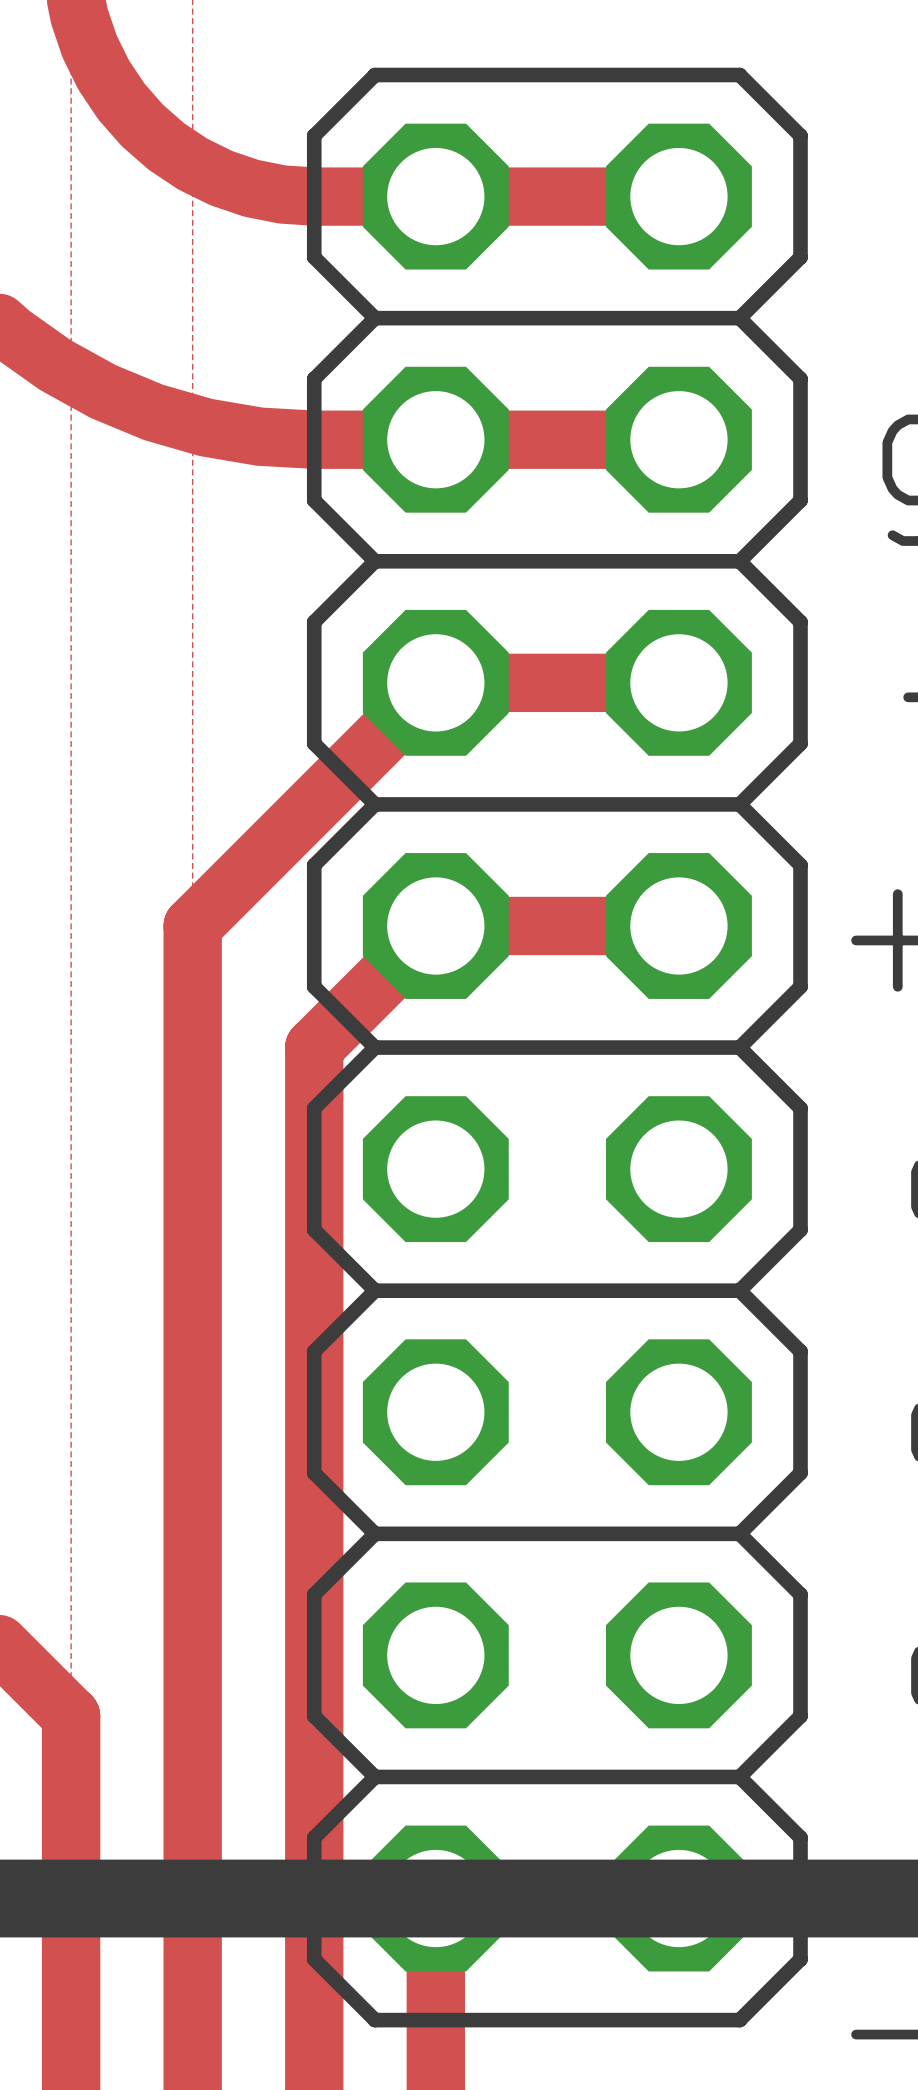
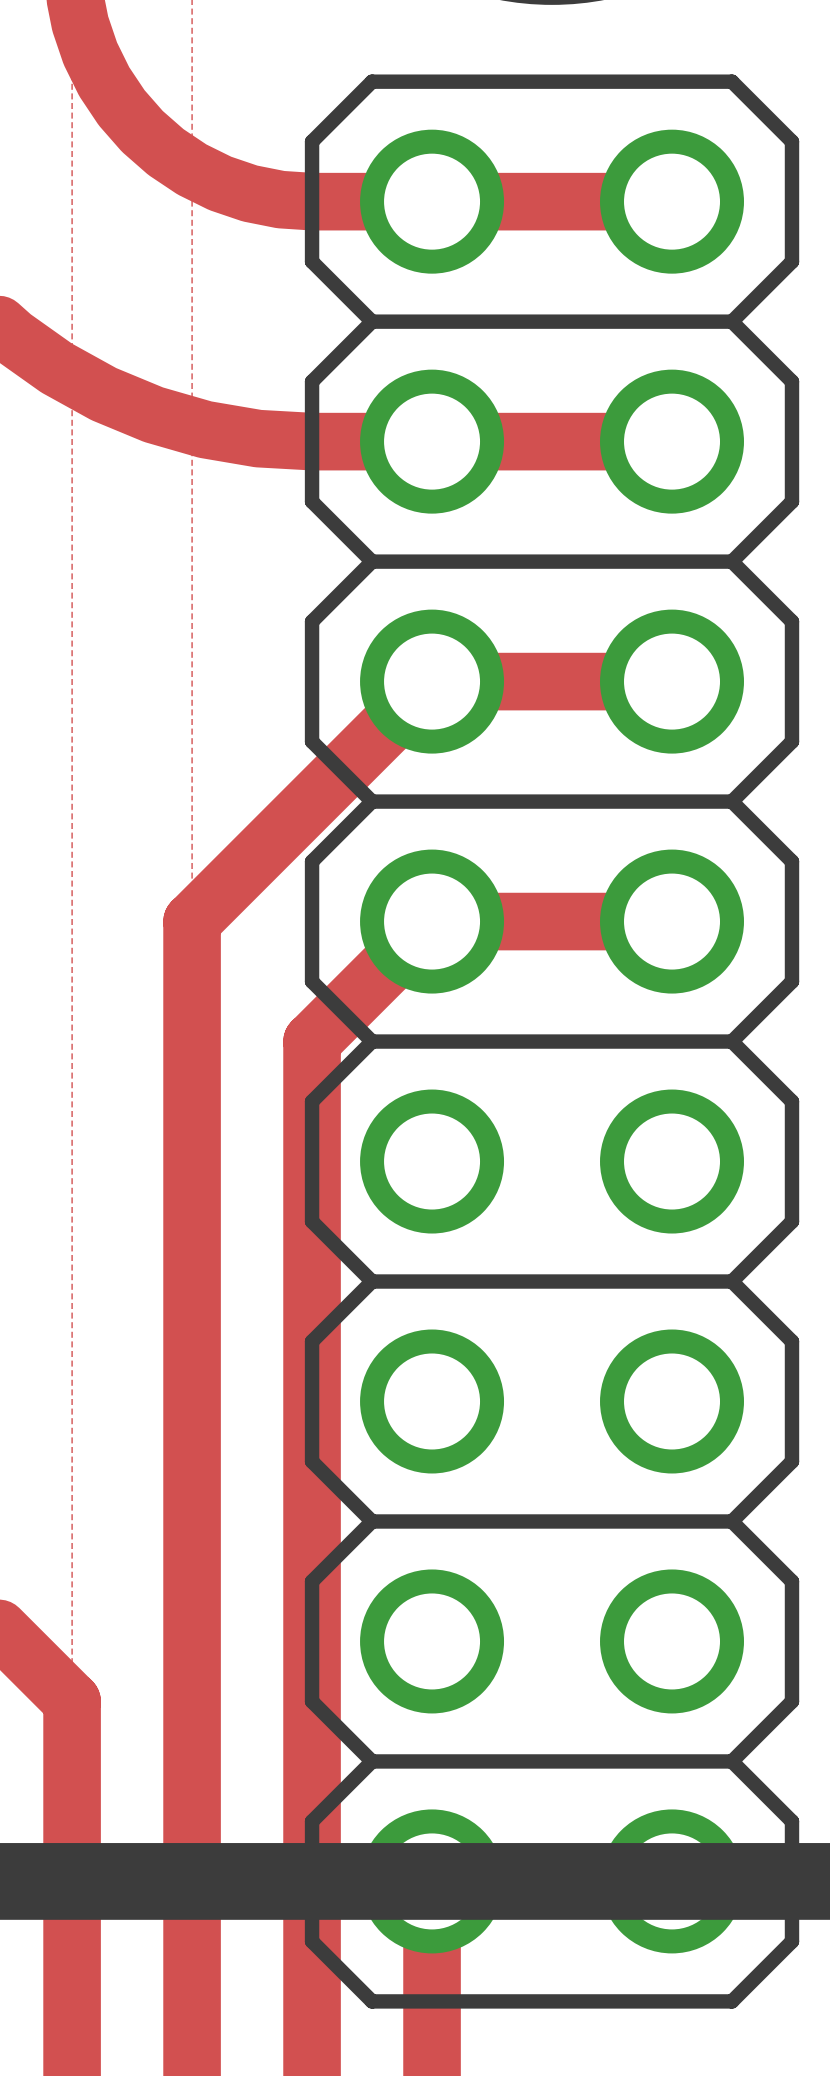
part footprint: [306, 67, 808, 2028] -> [304, 74, 800, 2009]

